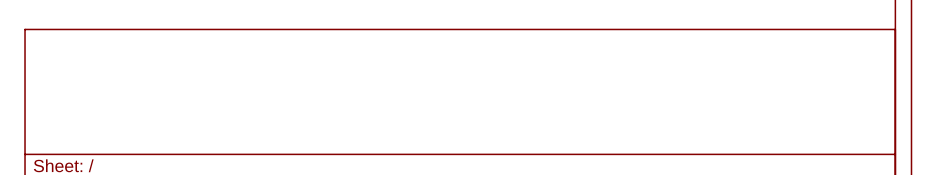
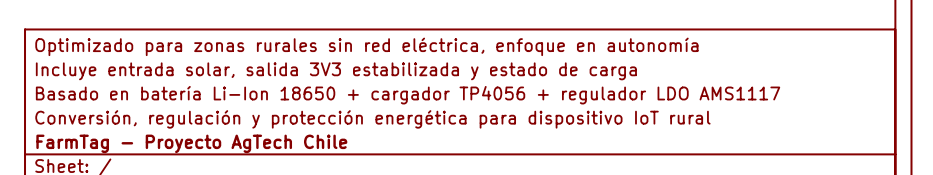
title block: none -> Optimizado para zonas rurales sin red eléctrica, enfoque en autonomía (366, 46)
title block: none -> Incluye entrada solar, salida 3V3 estabilizada y estado de carga (336, 71)
title block: none -> Basado en batería Li-Ion 18650 + cargador TP4056 + regulador LDO AMS1117 (408, 95)
title block: none -> Conversión, regulación y protección energética para dispositivo IoT rural (372, 119)
title block: none -> FarmTag - Proyecto AgTech Chile (191, 143)

